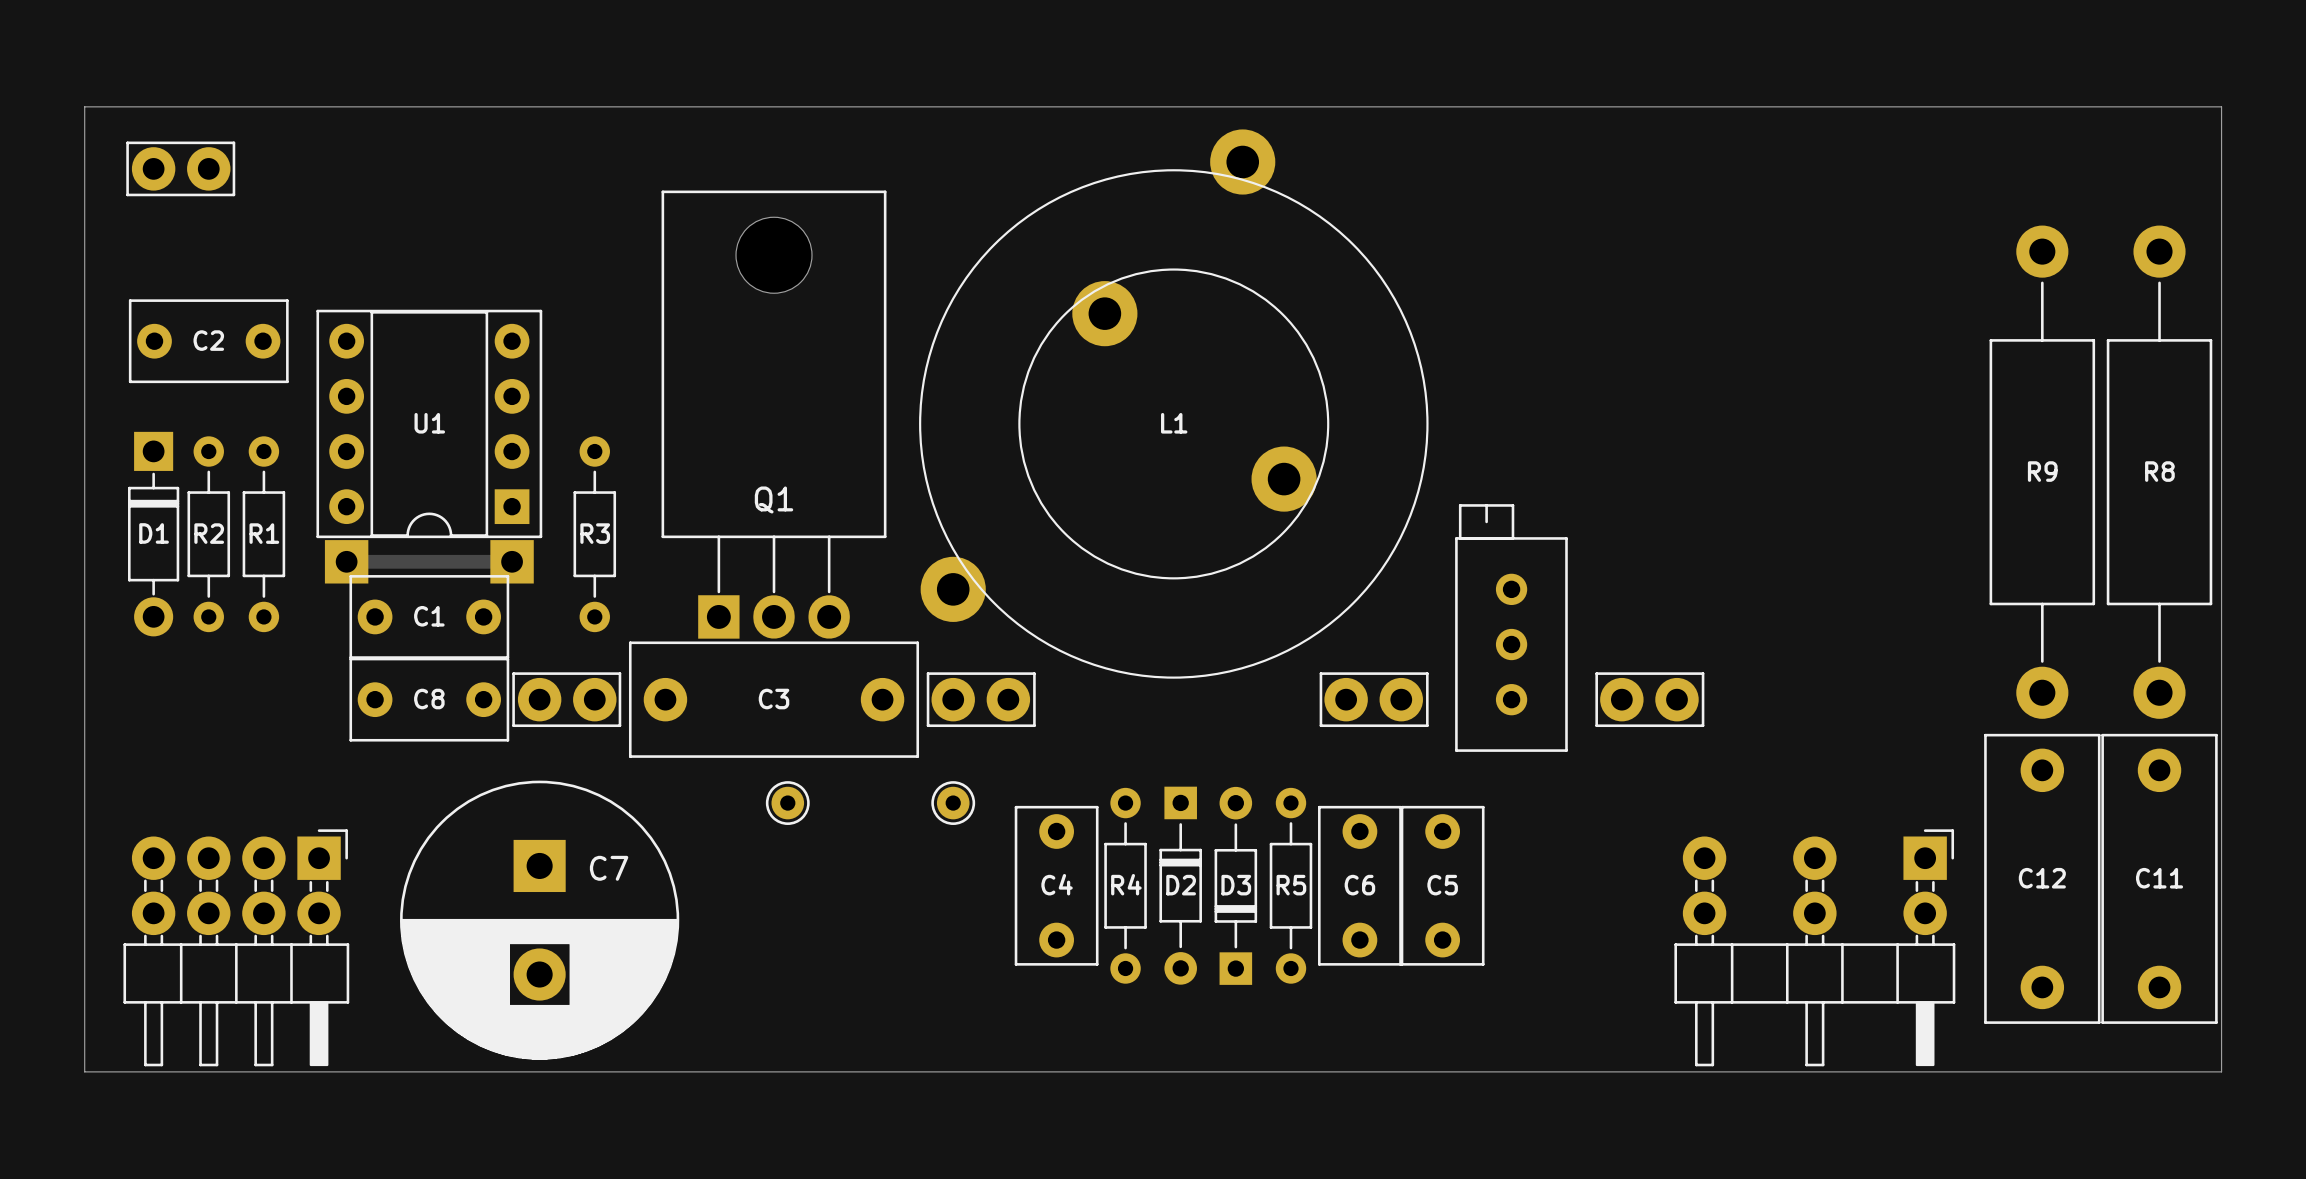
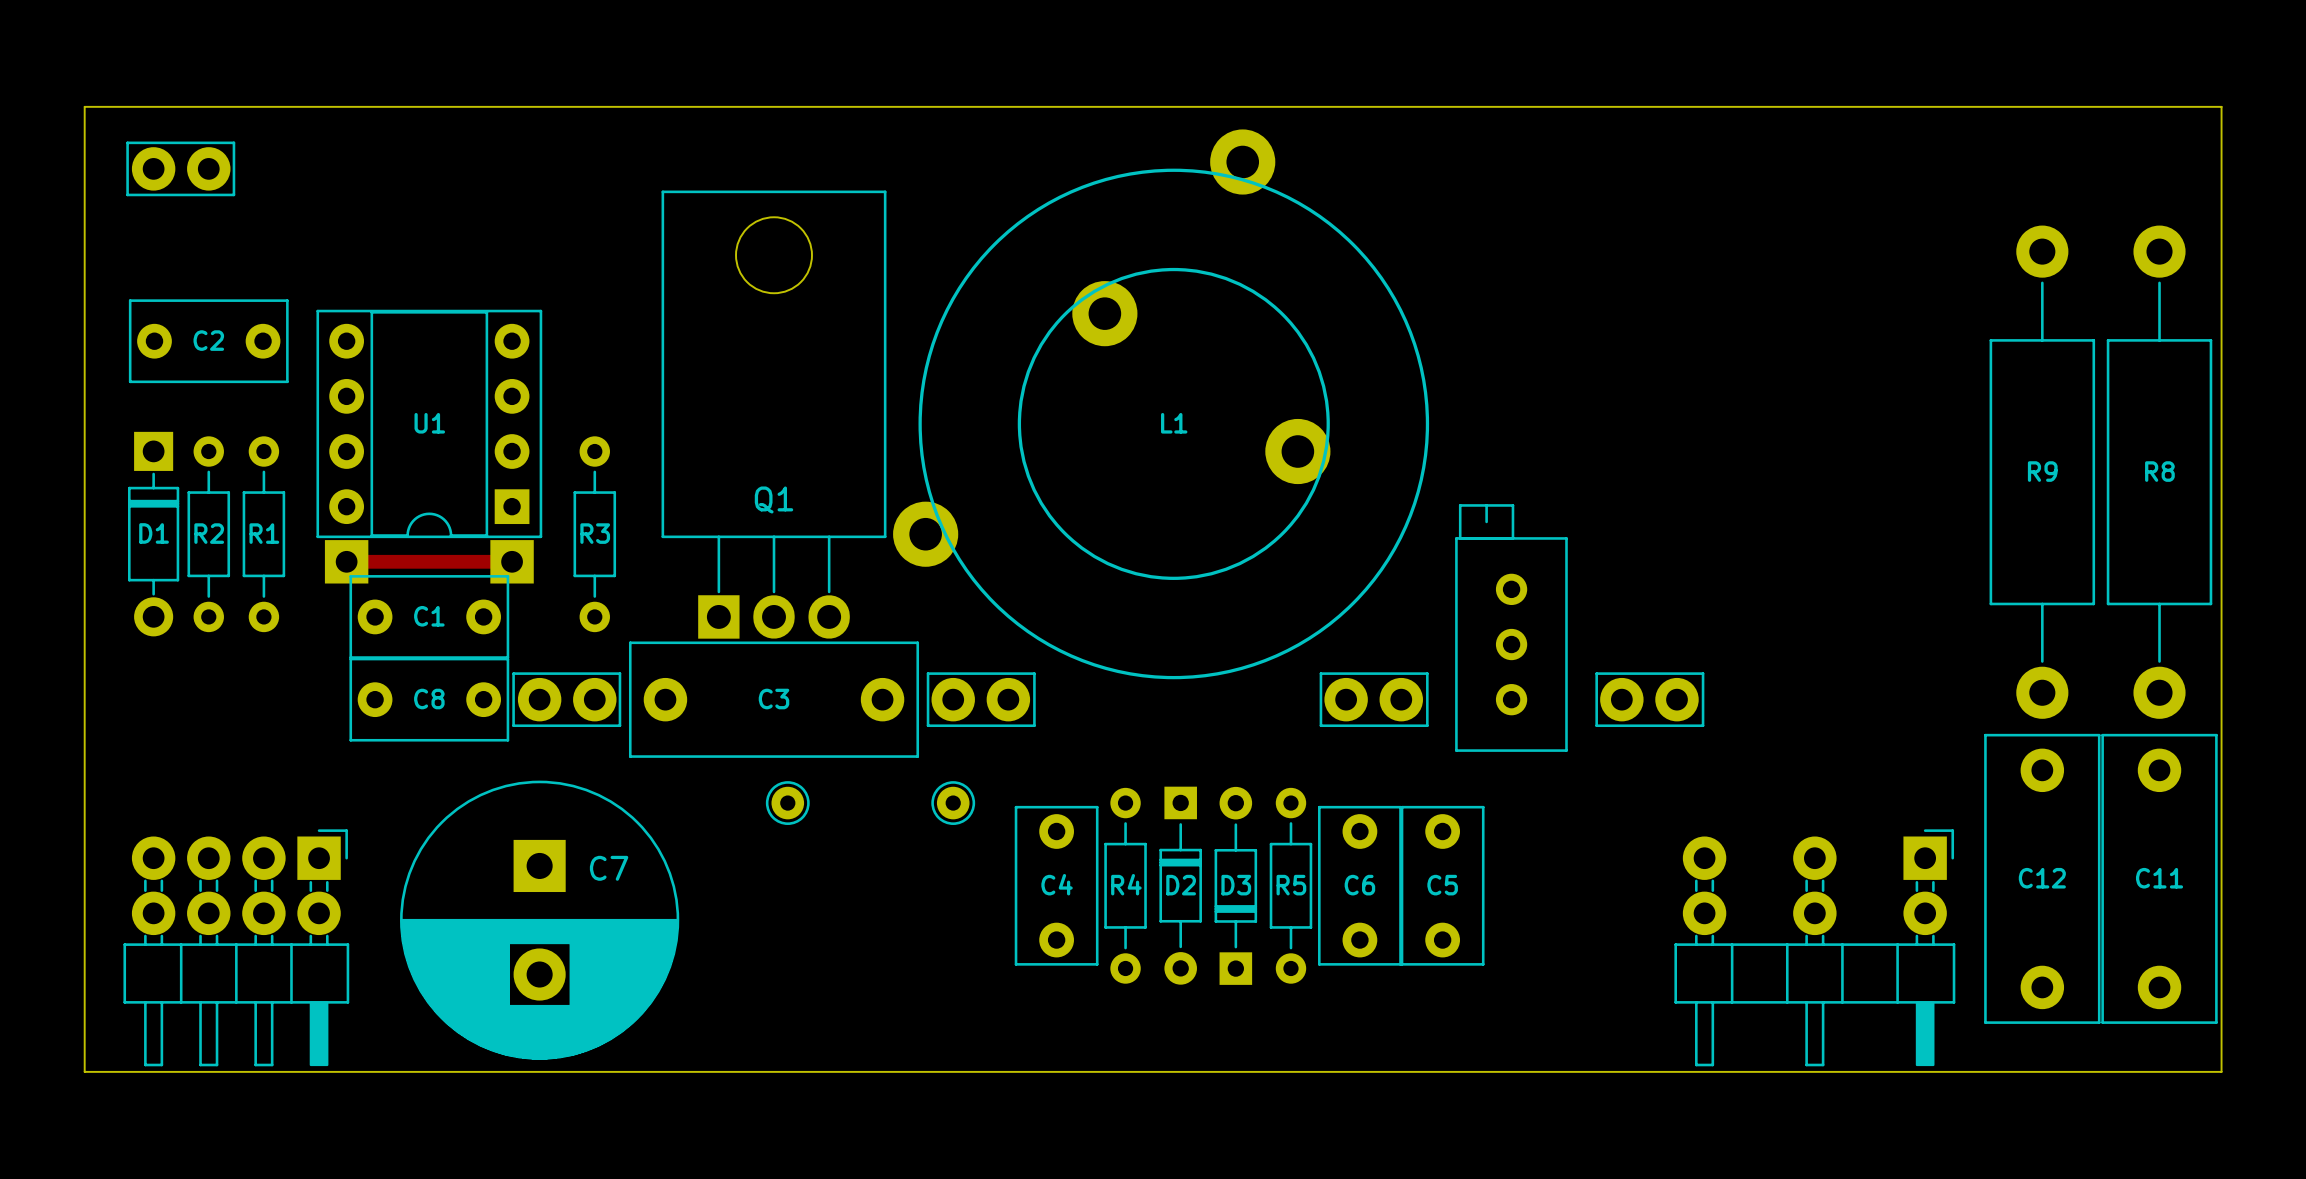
L1 footprint: [919, 129, 1429, 679] -> [893, 129, 1430, 680]

